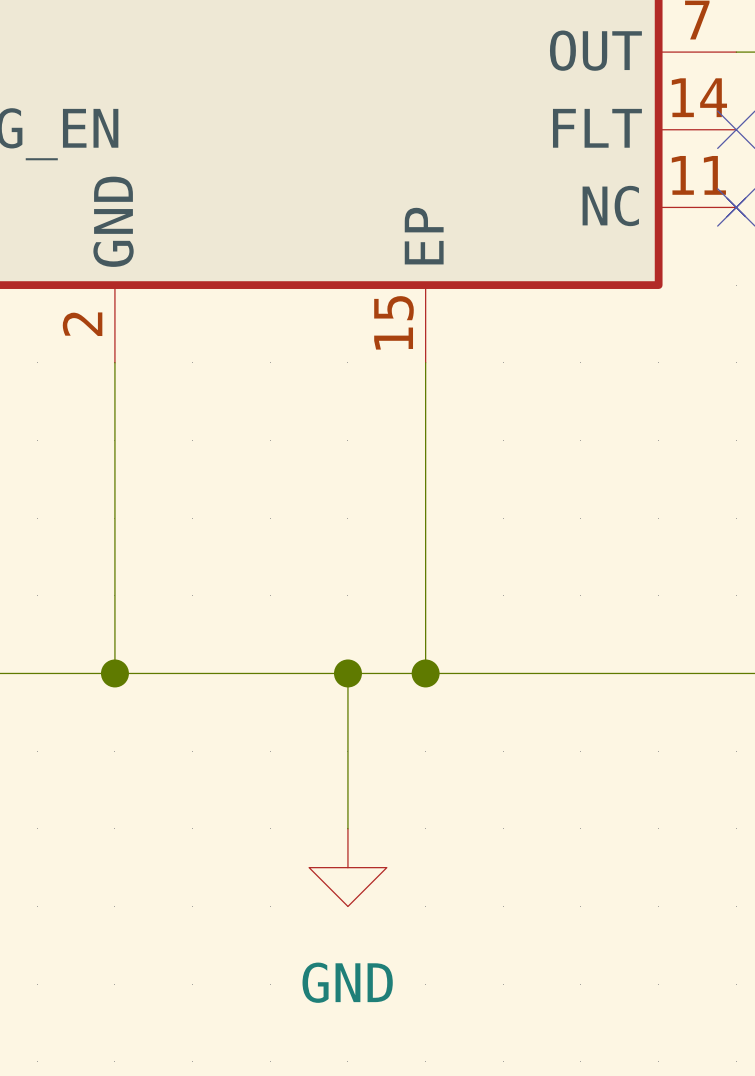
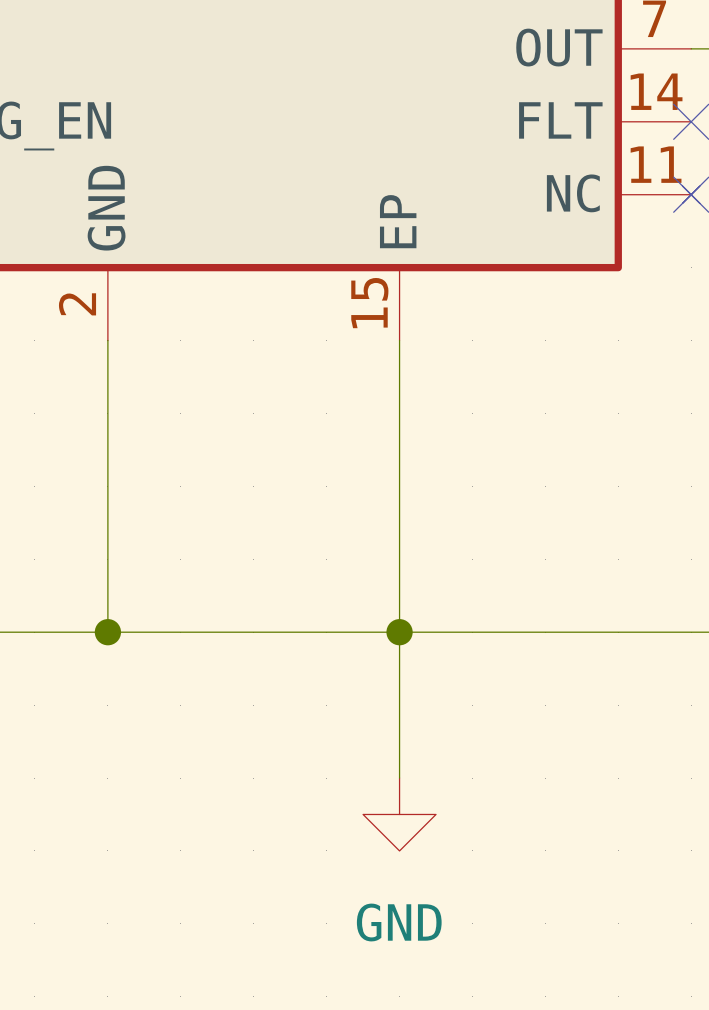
wire: (347, 673) (347, 828) -> (399, 632) (399, 778)
junction: (347, 673) -> none
power symbol position: GND (347, 867) -> GND (399, 814)

